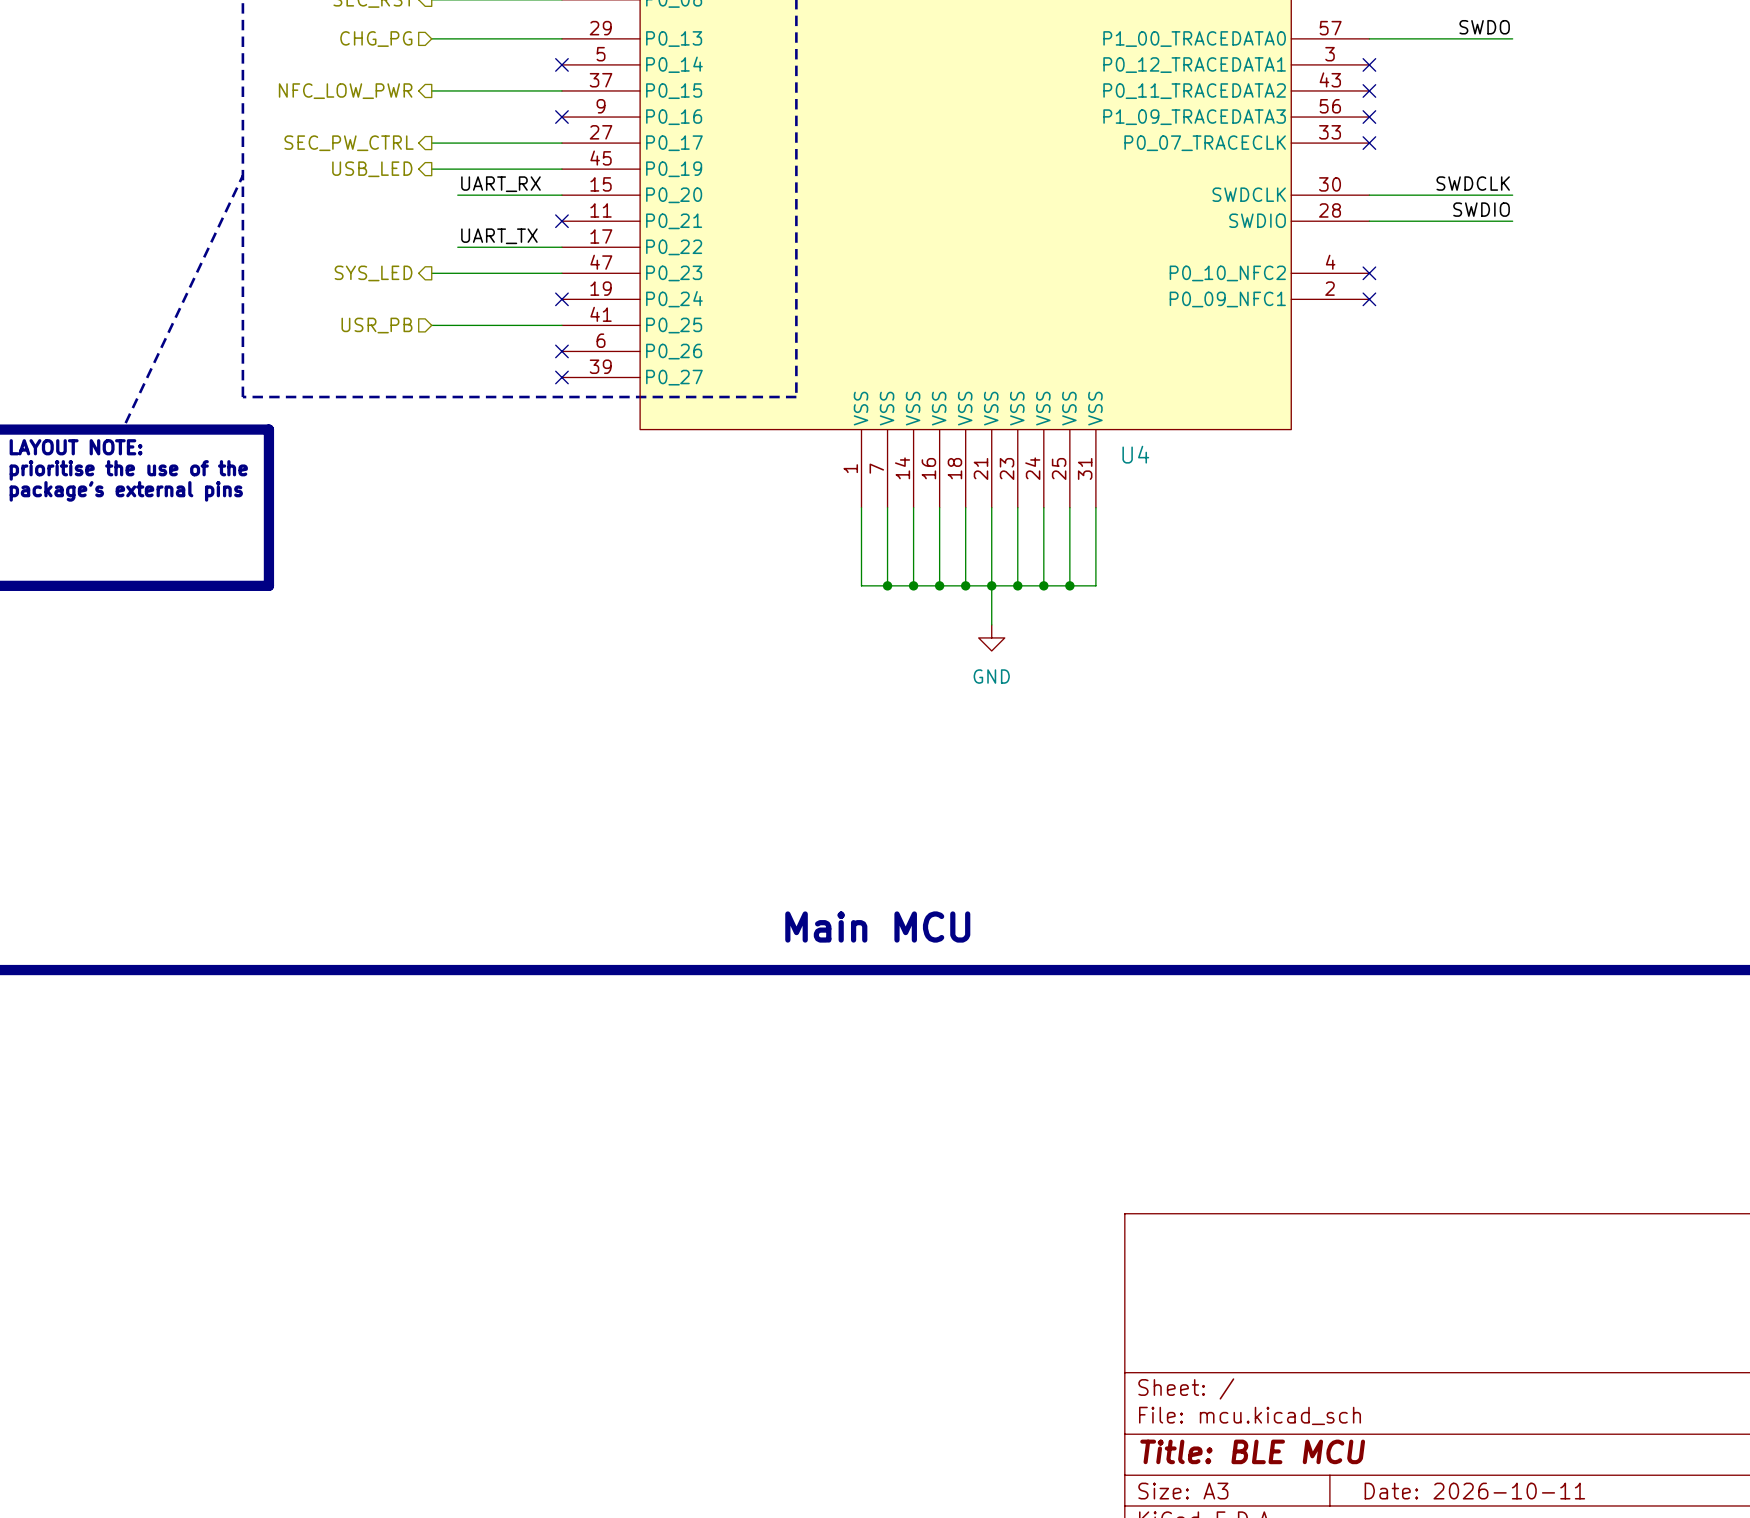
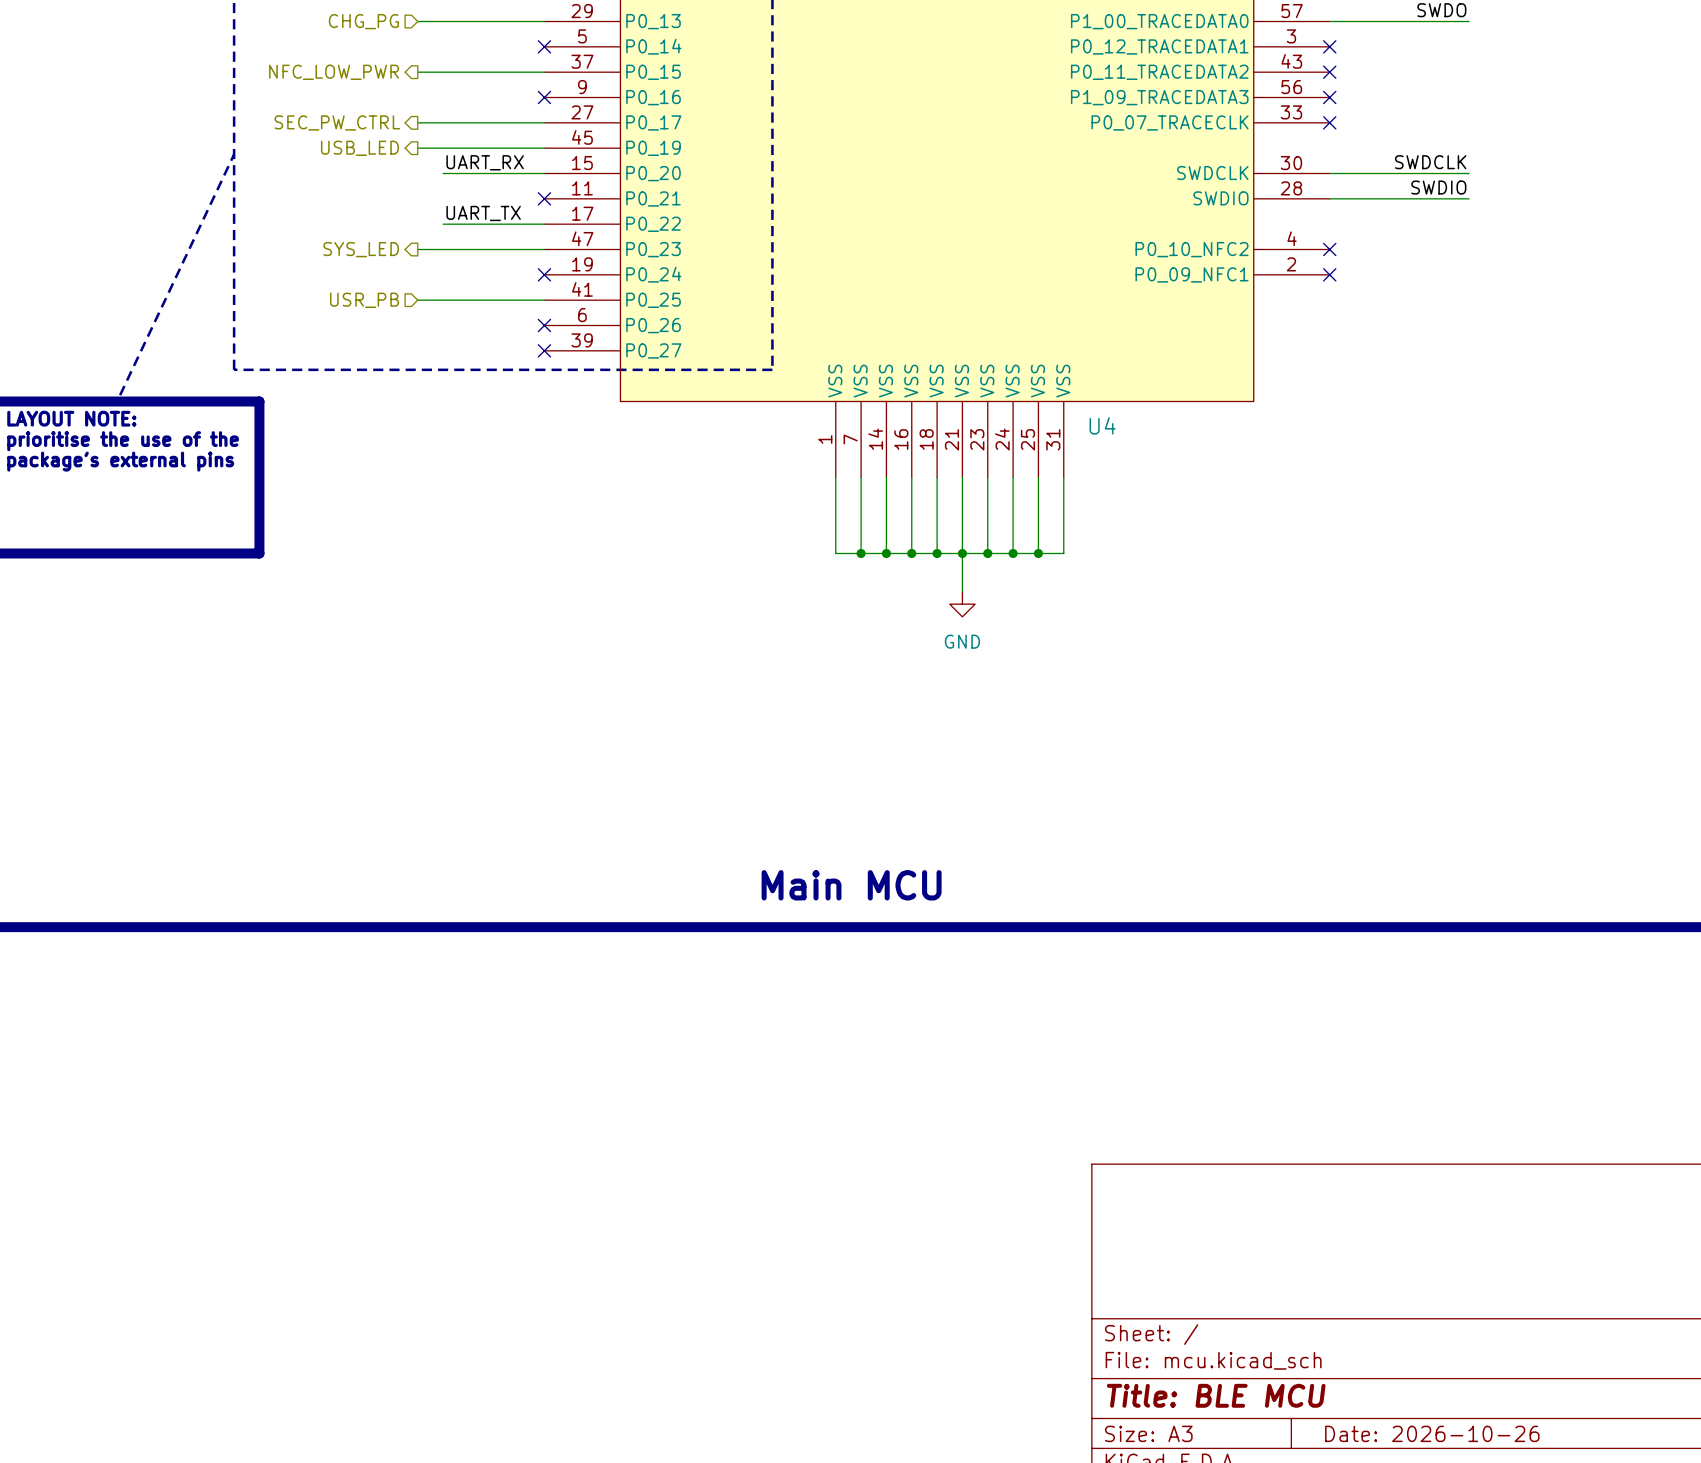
title block: Date: 2026-10-11 (1474, 1491) -> Date: 2026-10-26 (1432, 1433)

